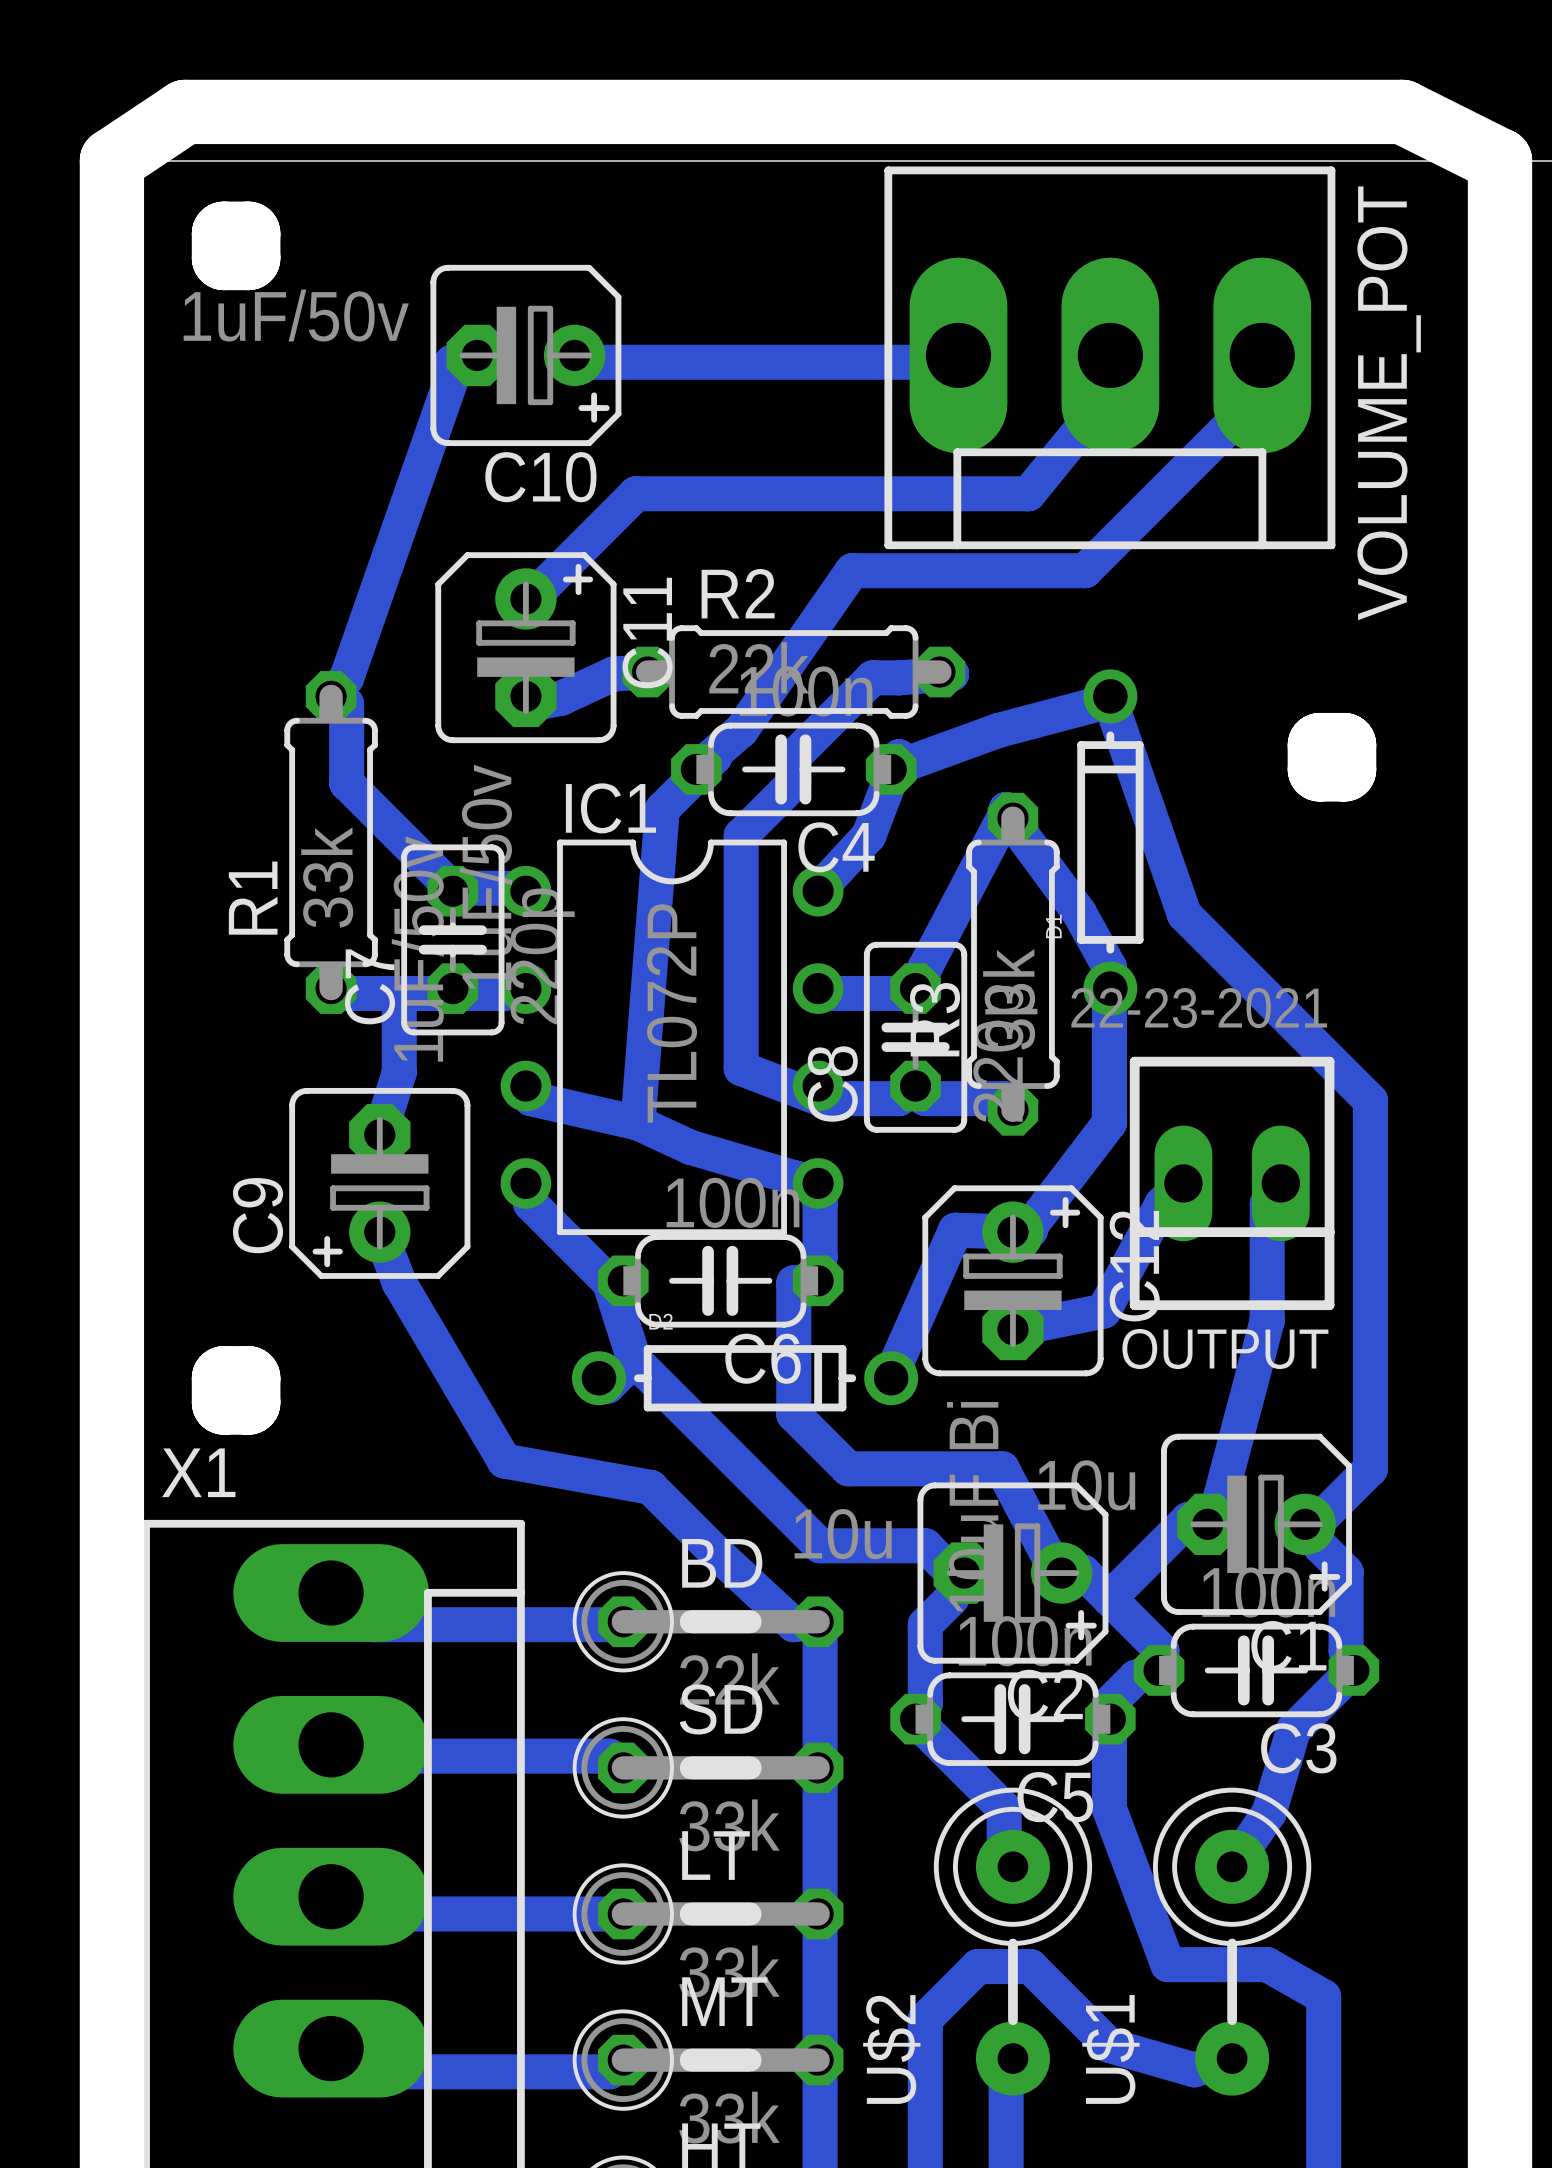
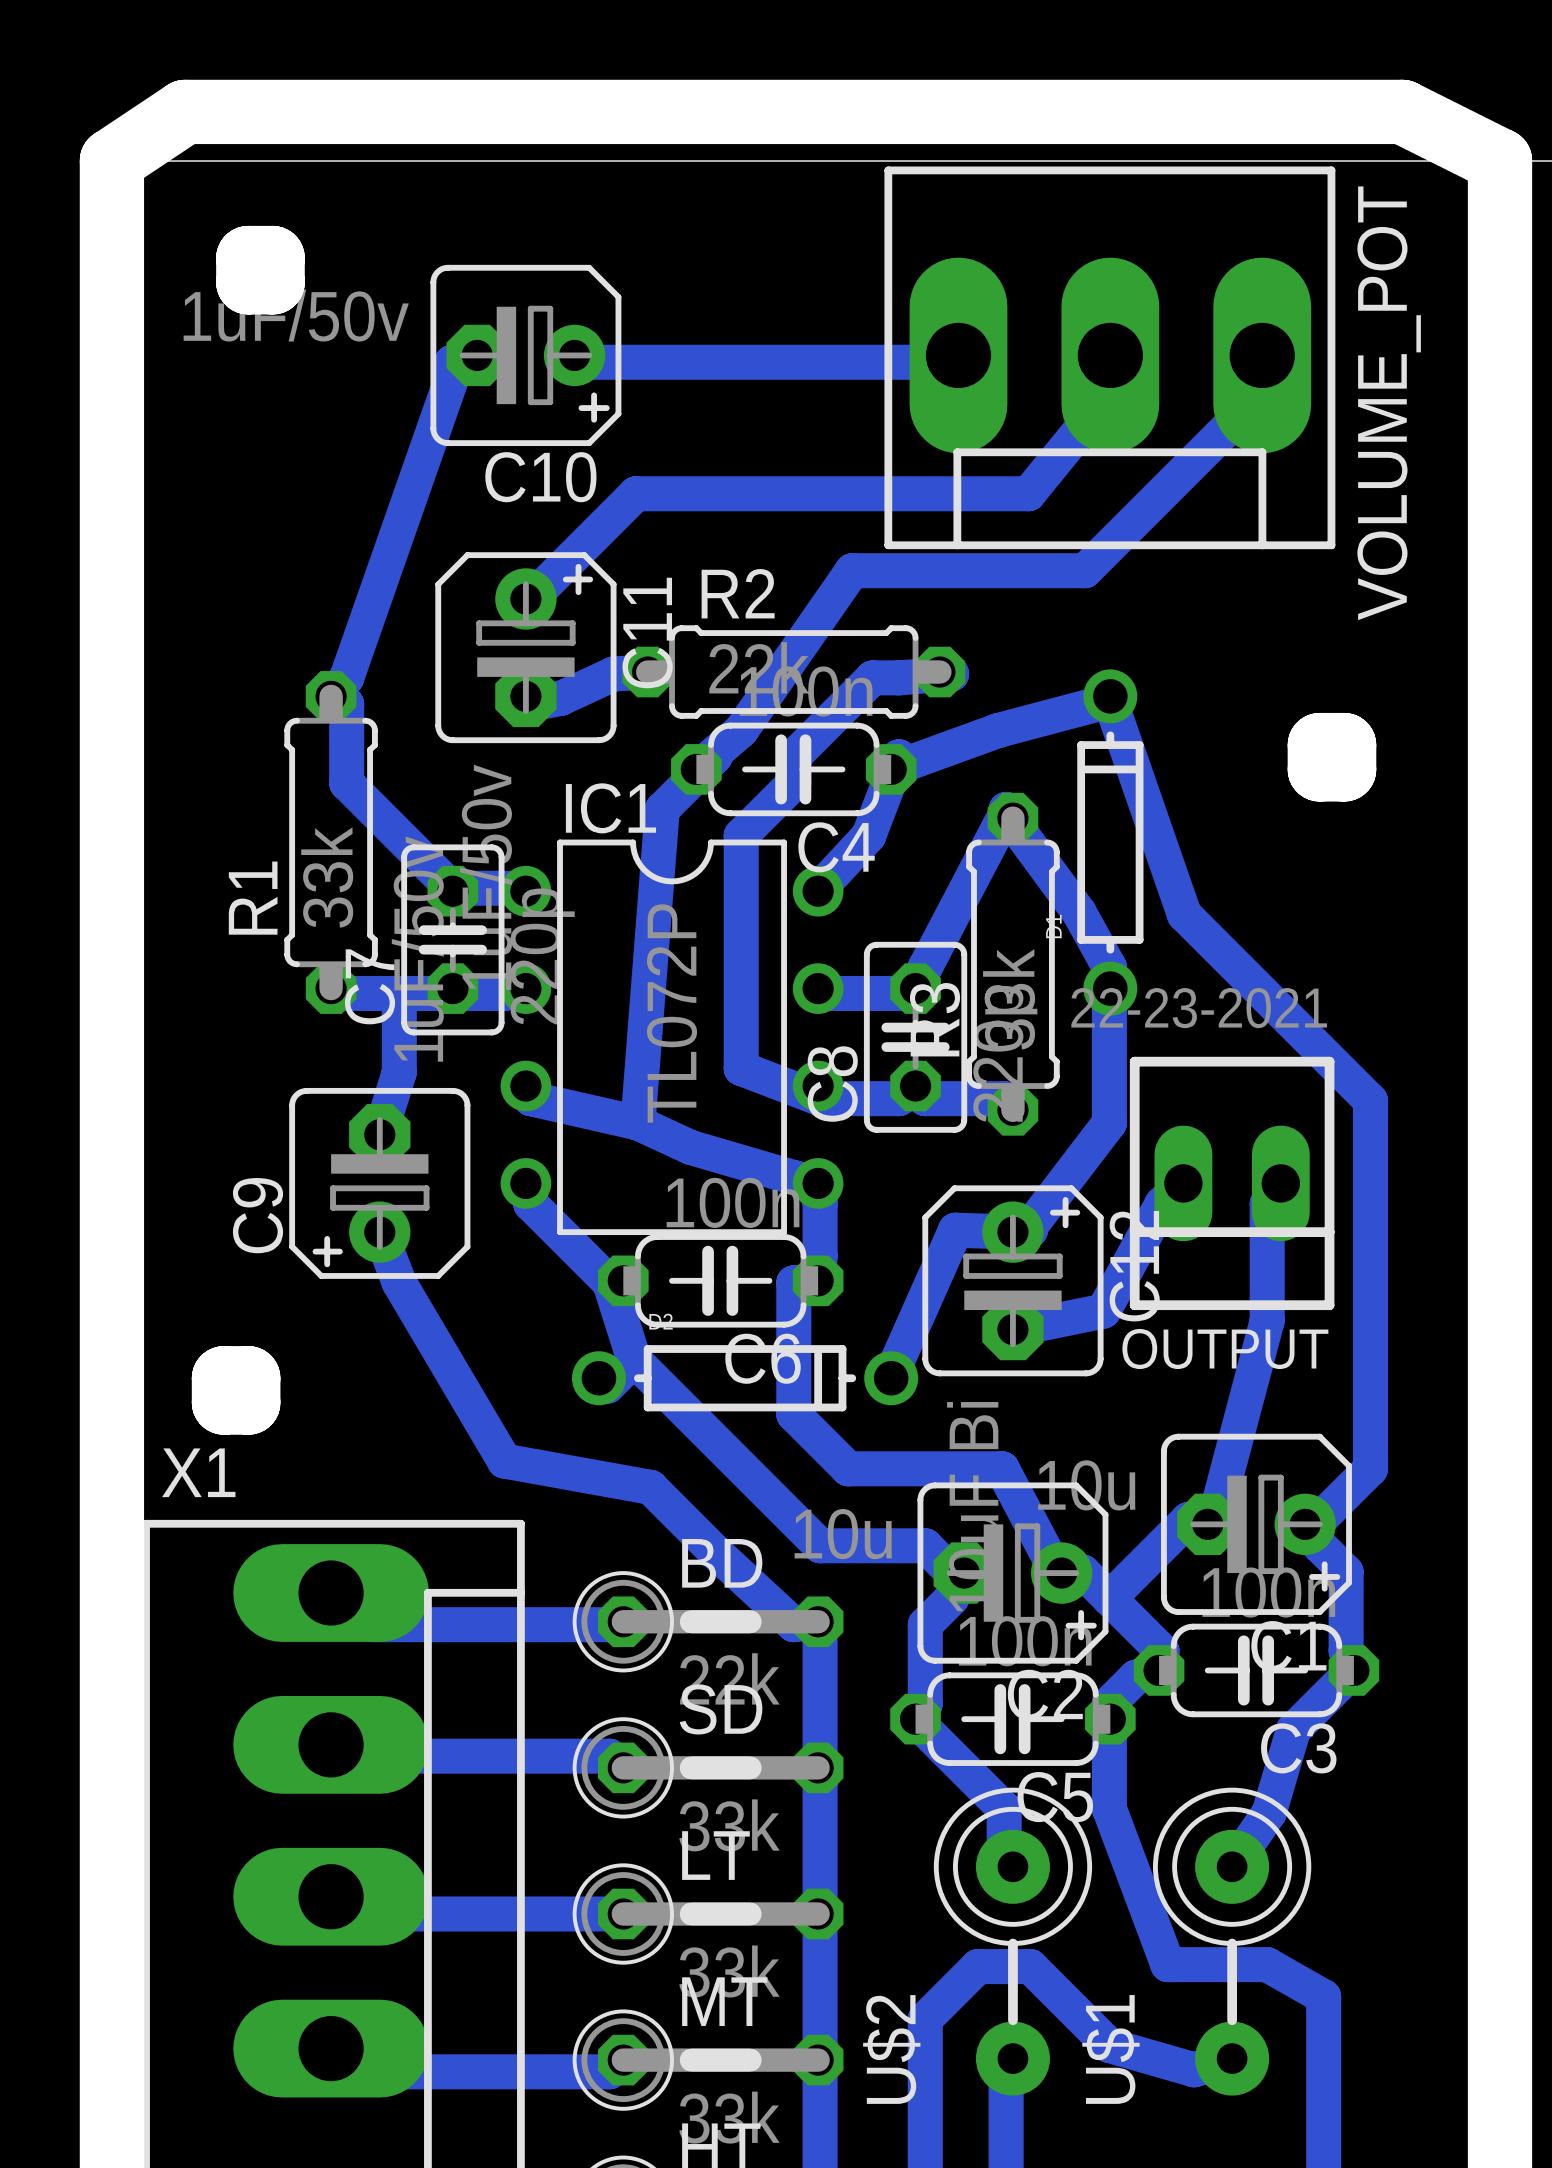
board edge: (223, 233) (223, 258) (248, 258) (248, 233) (223, 233) -> (248, 258) (248, 282) (272, 282) (272, 258) (248, 258)

